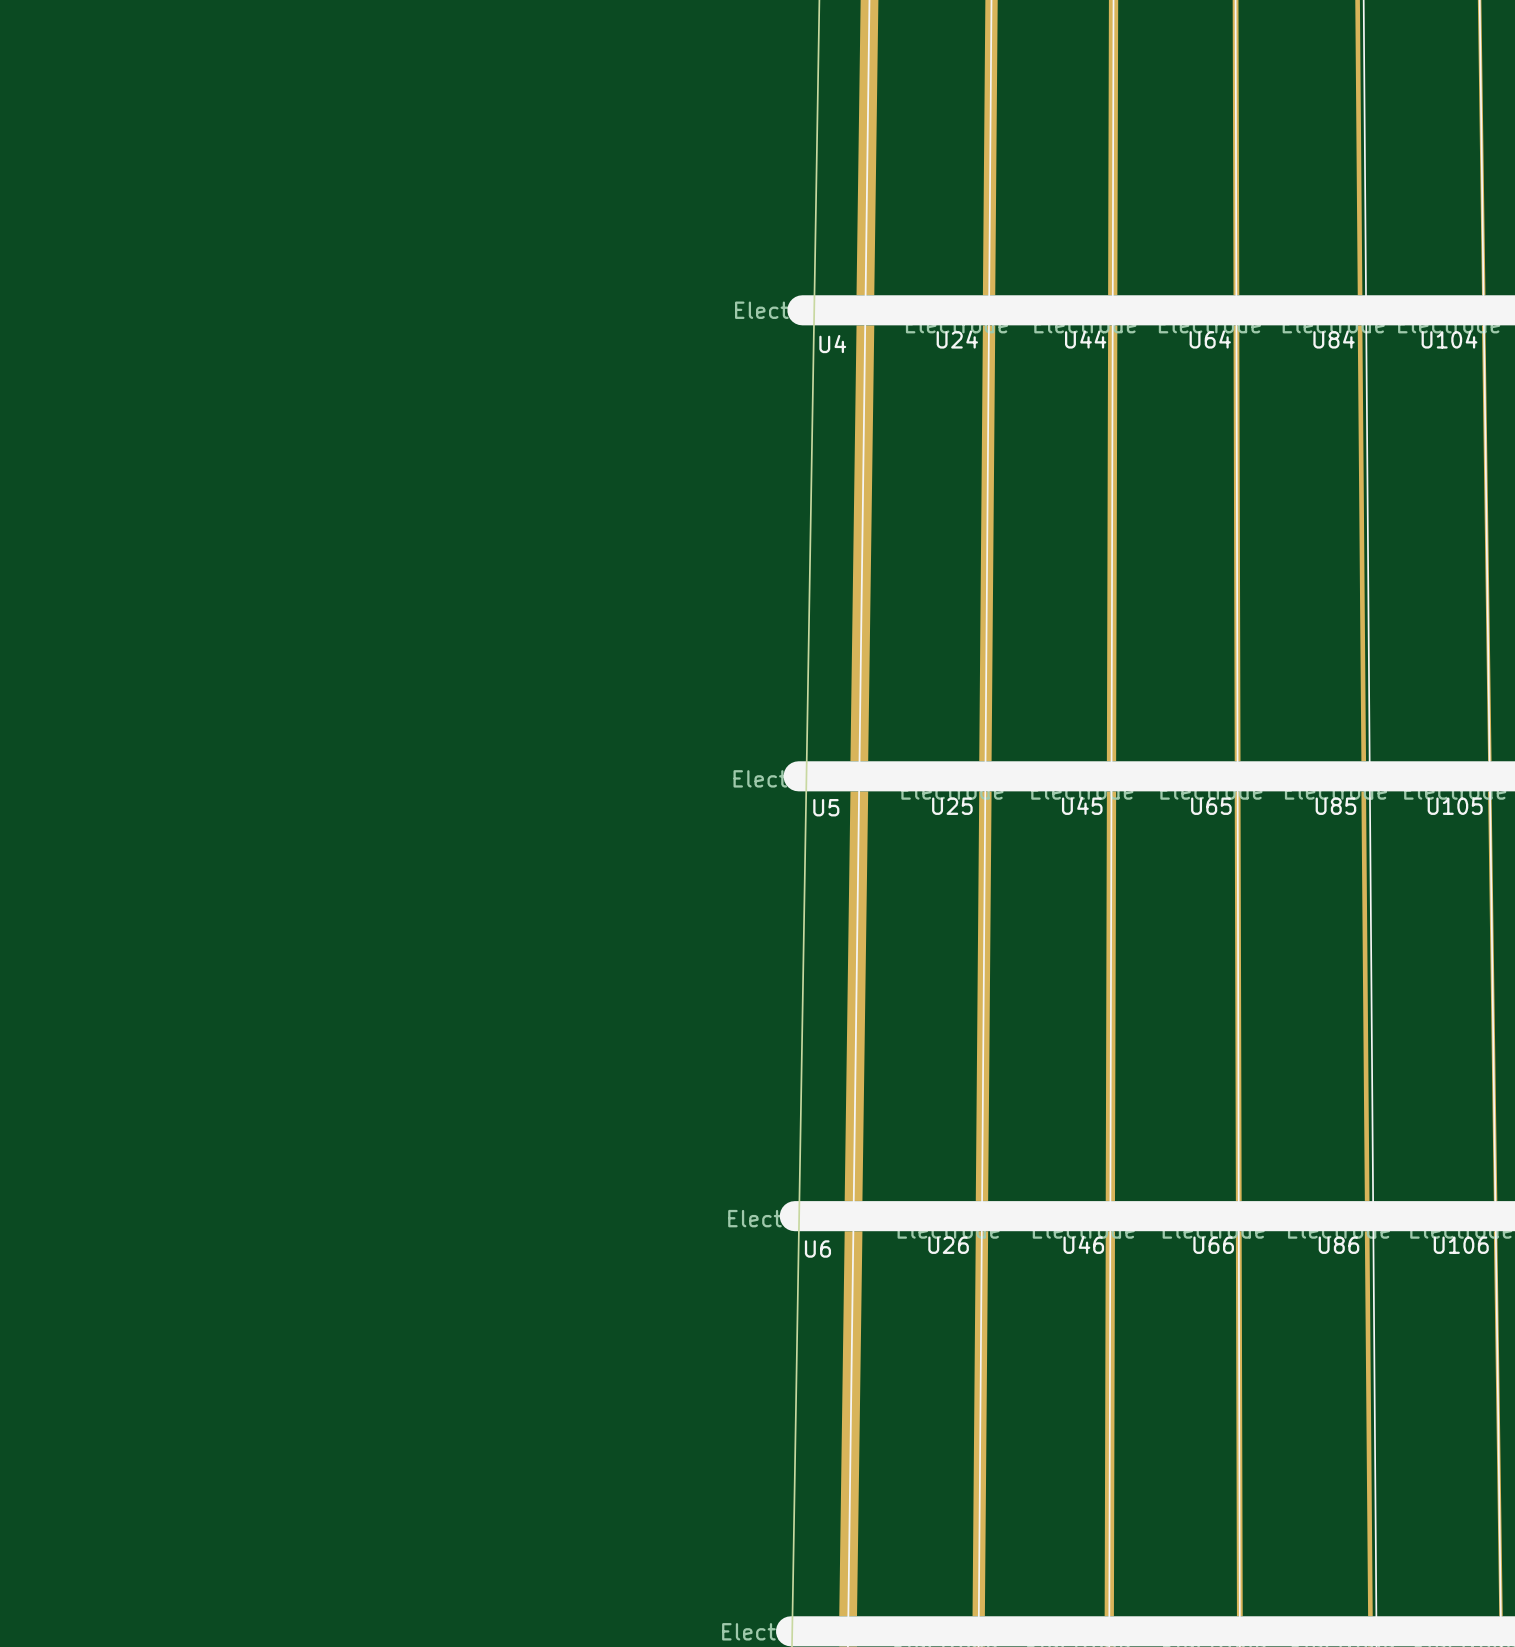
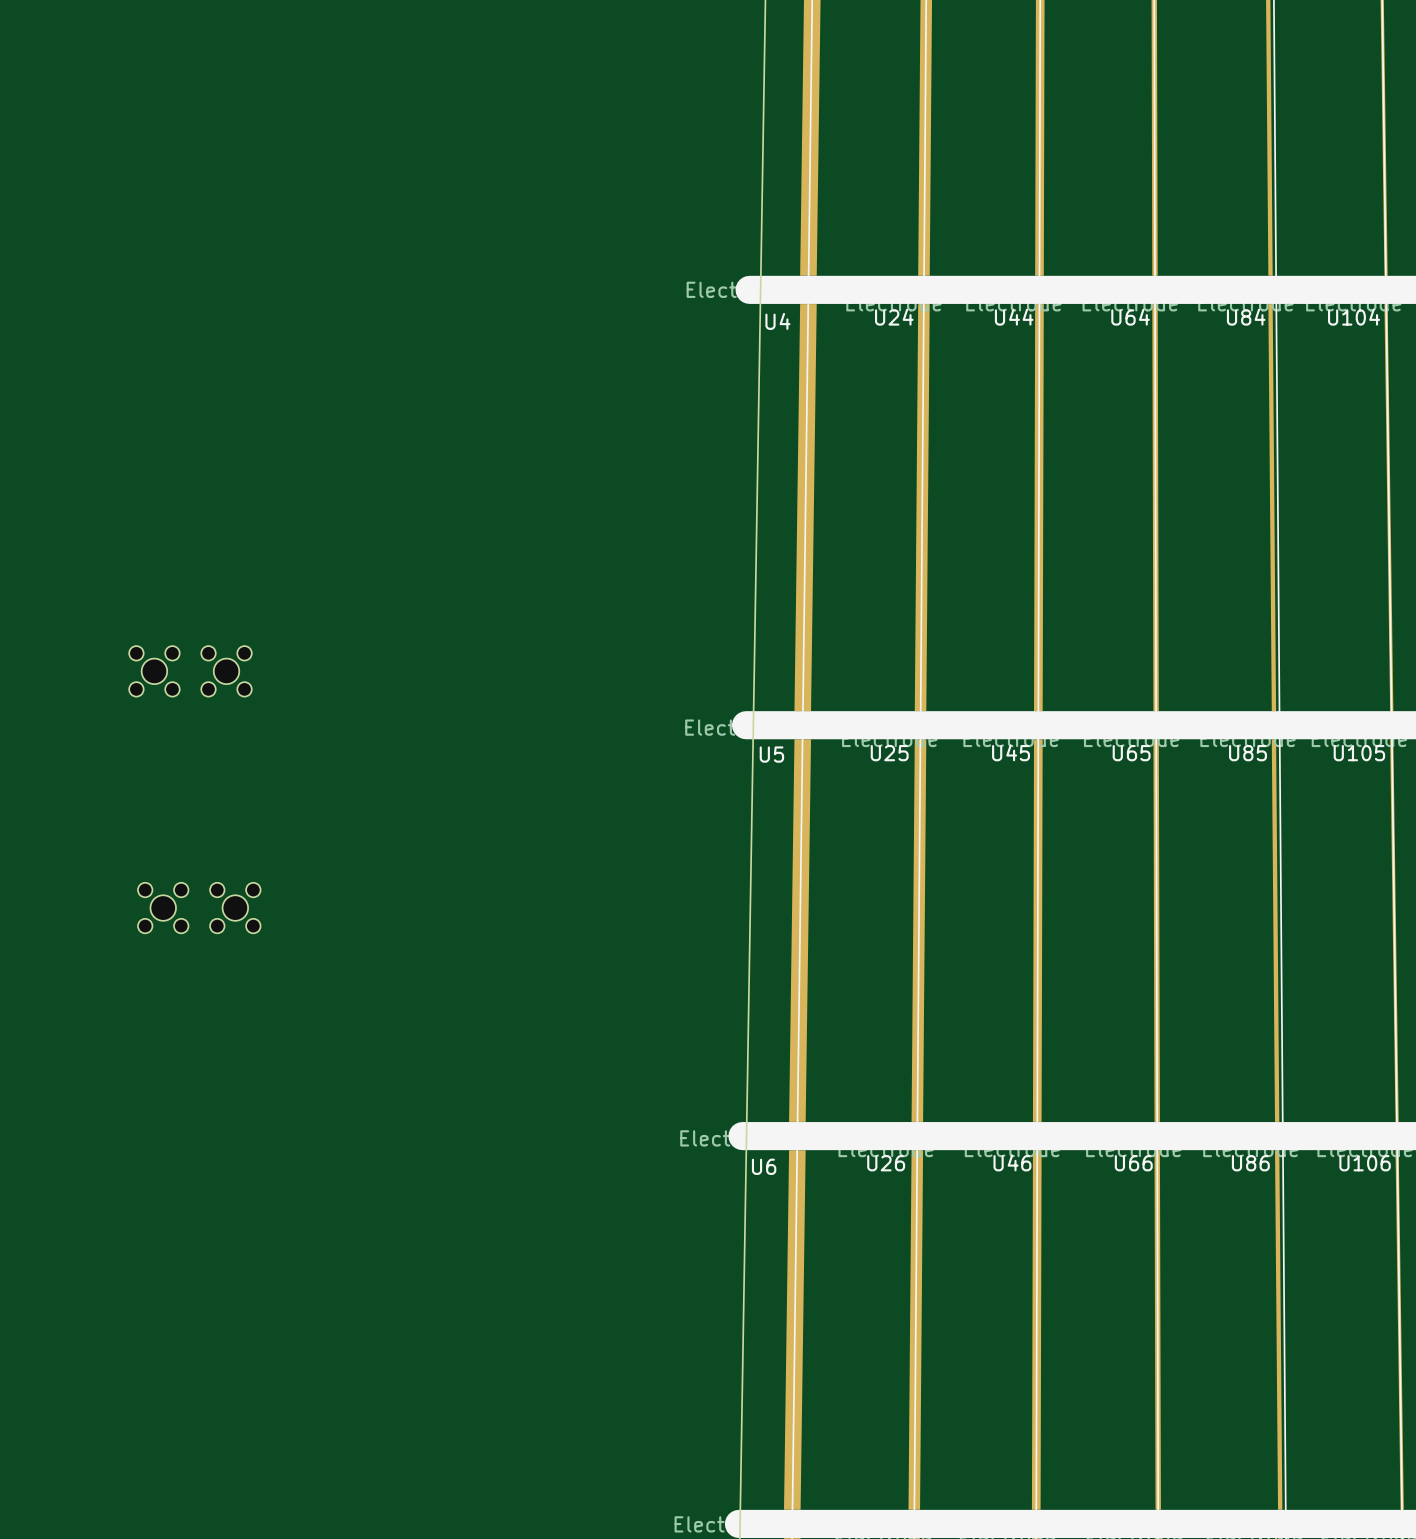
part: none -> (190, 671)
part: none -> (199, 908)

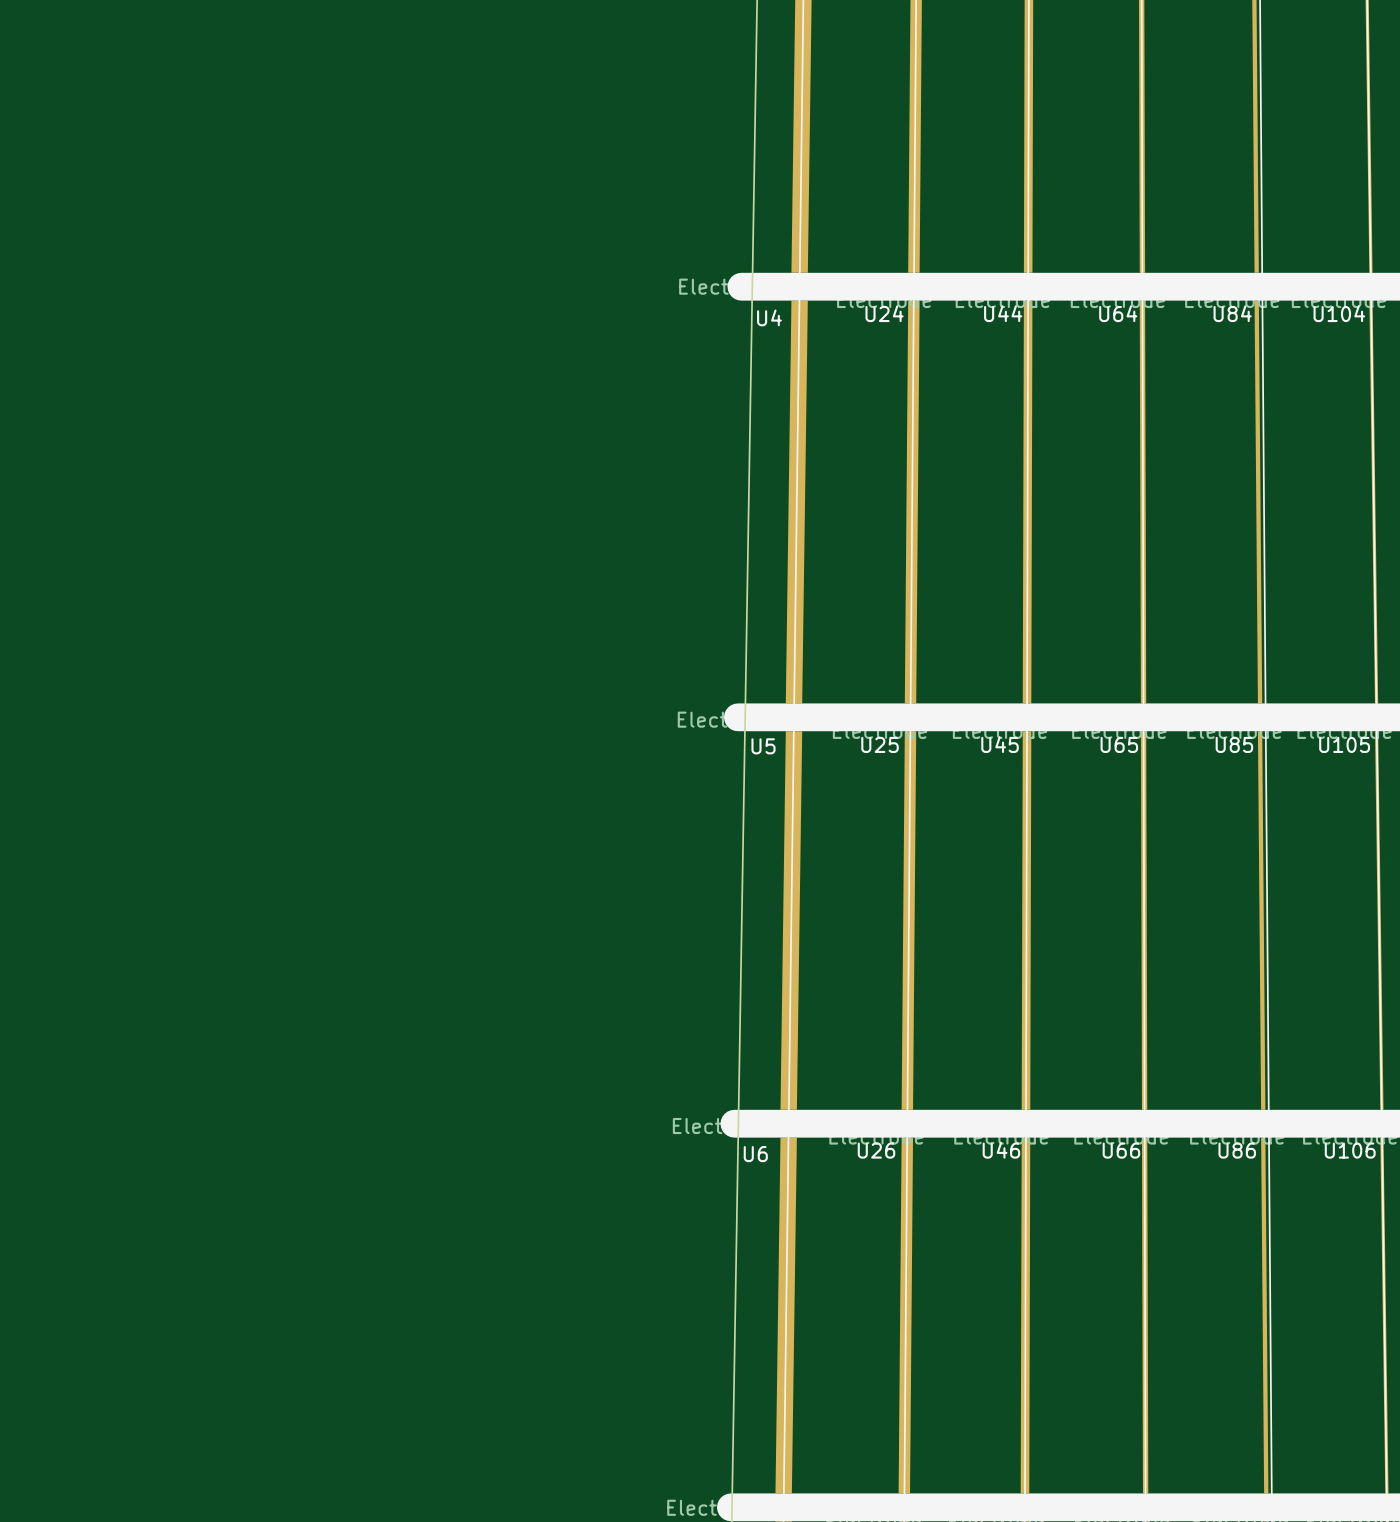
part: (190, 671) -> none
part: (199, 908) -> none

